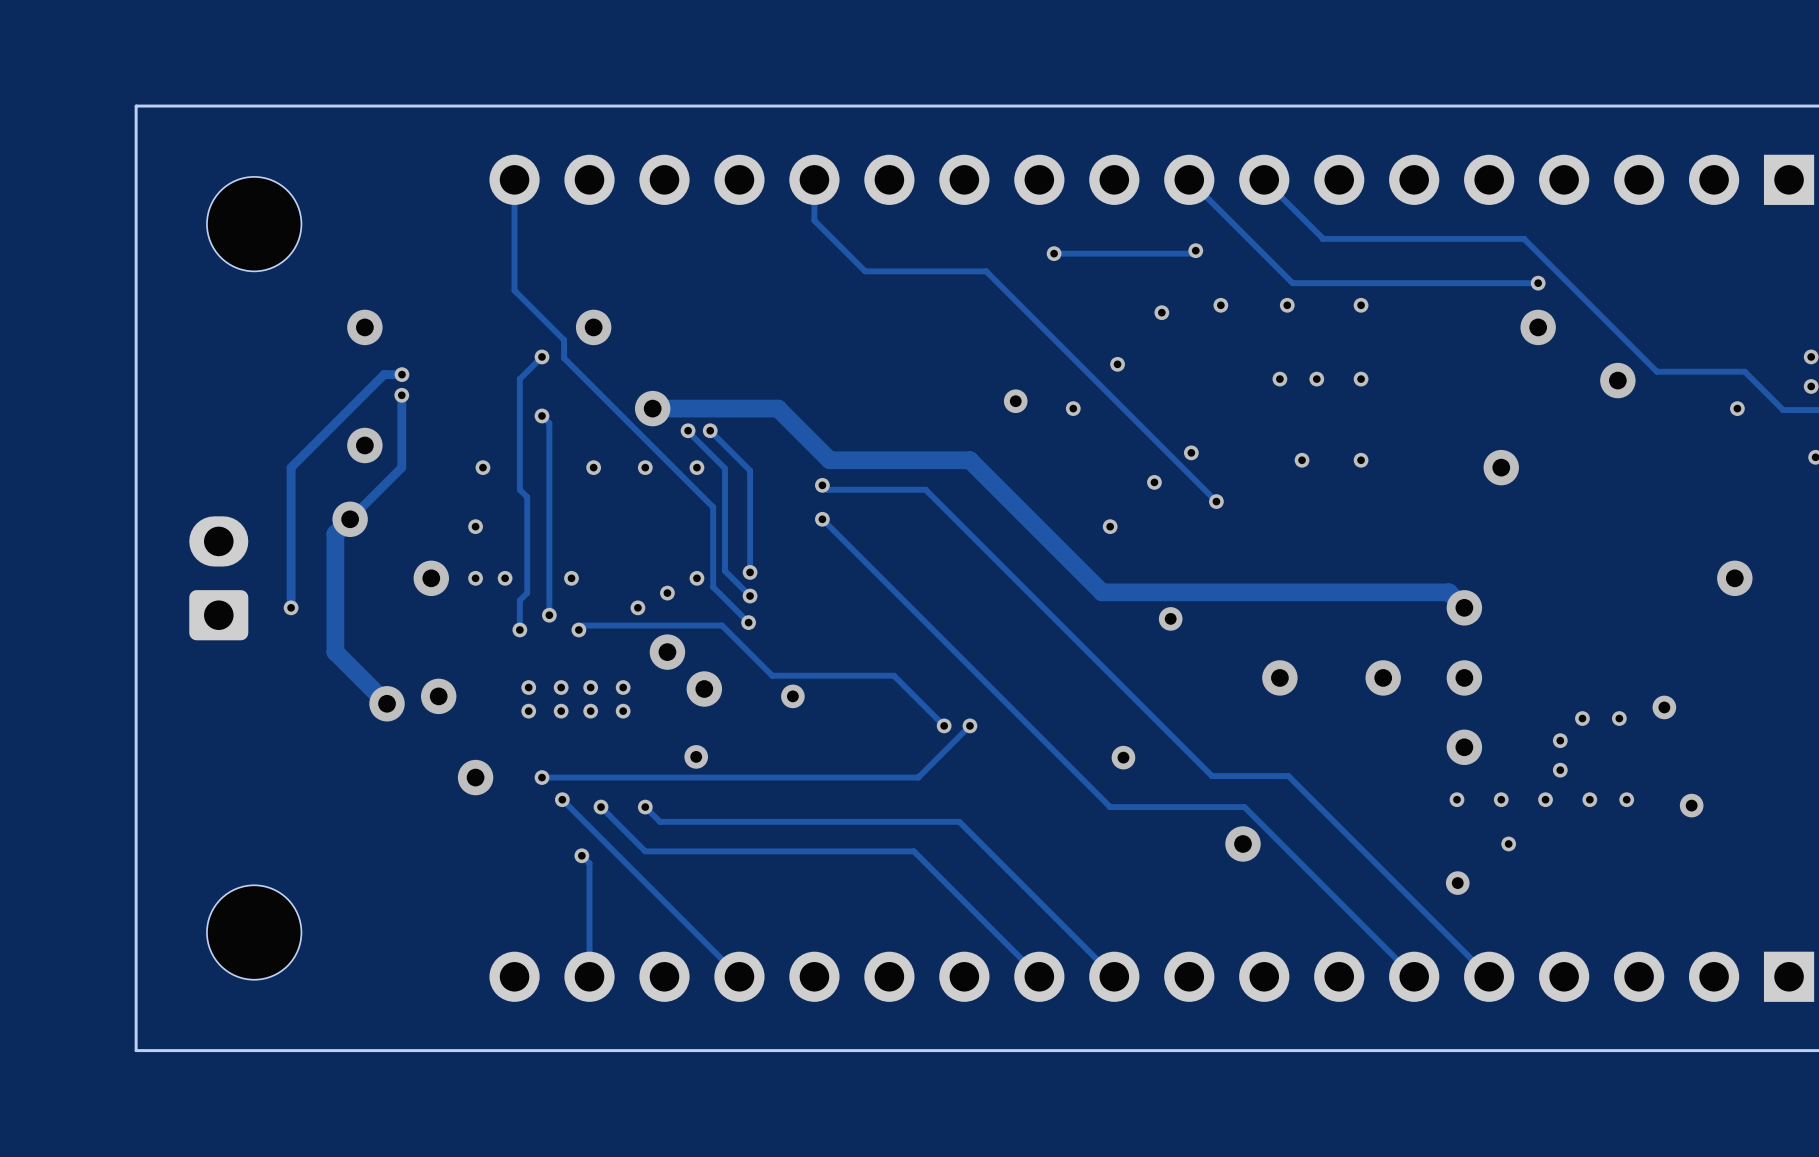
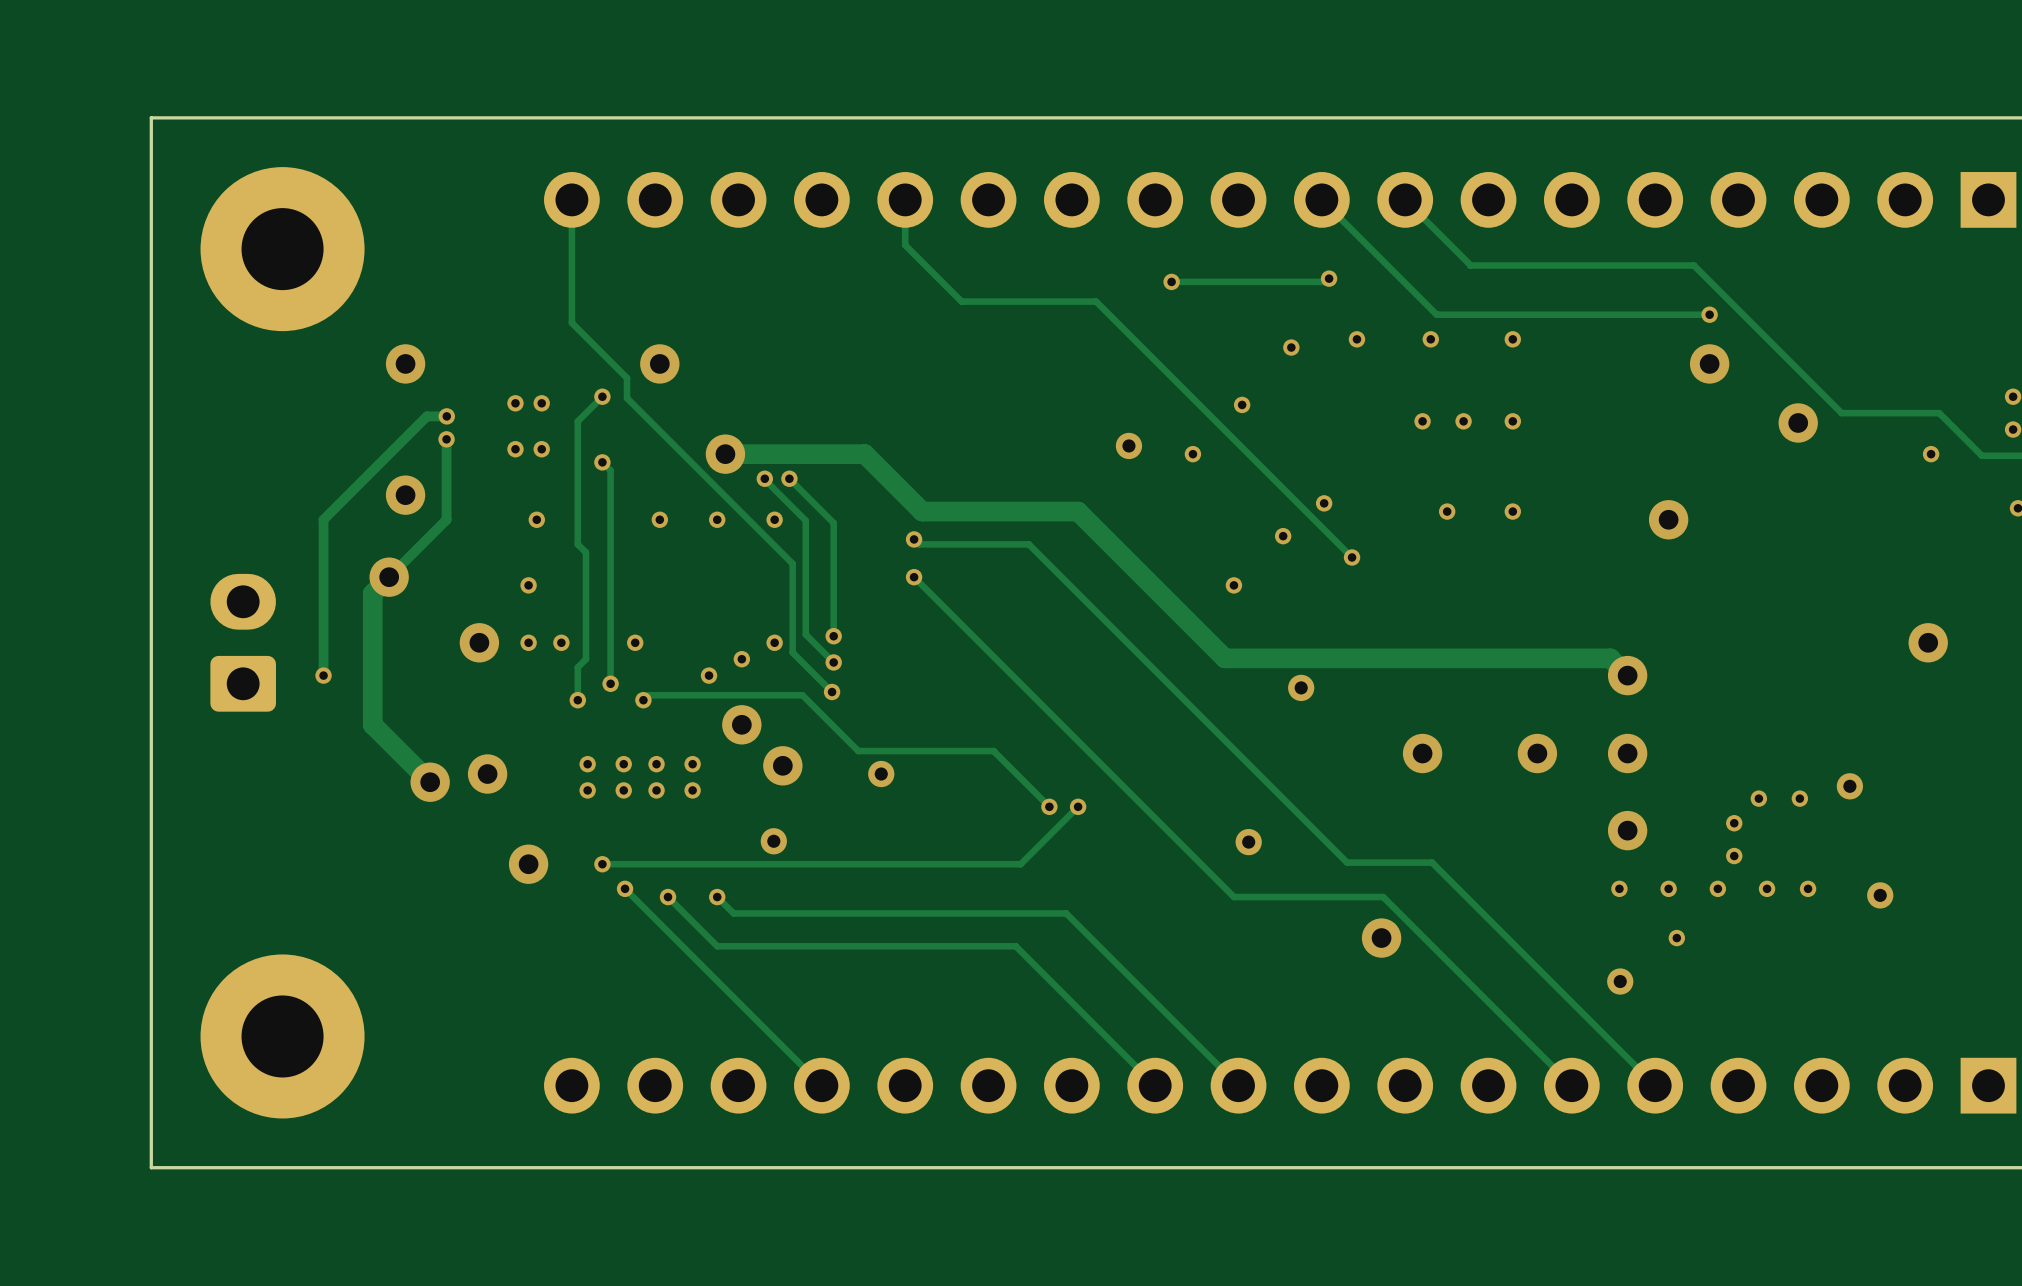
part footprint: [206, 176, 302, 272] -> [200, 167, 365, 332]
via: none -> (515, 403)
via: none -> (541, 403)
via: none -> (515, 449)
via: none -> (541, 449)
track: (581, 855) (589, 863) (589, 976) -> none
via: (581, 855) -> none
part footprint: [206, 885, 302, 980] -> [200, 954, 365, 1119]

